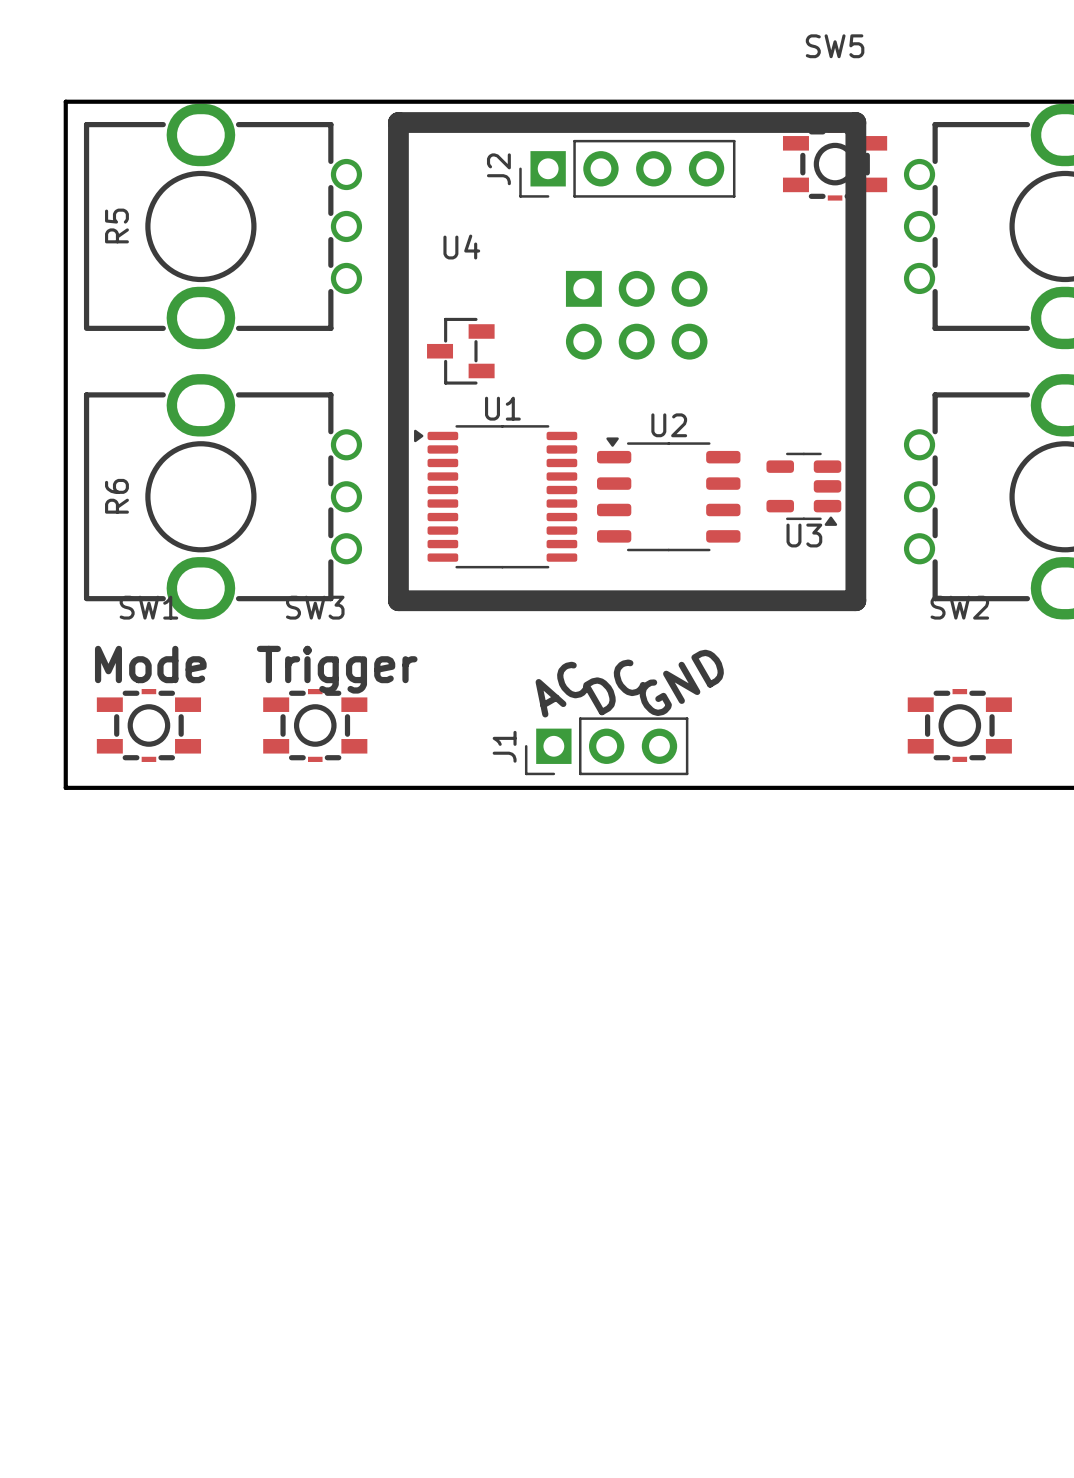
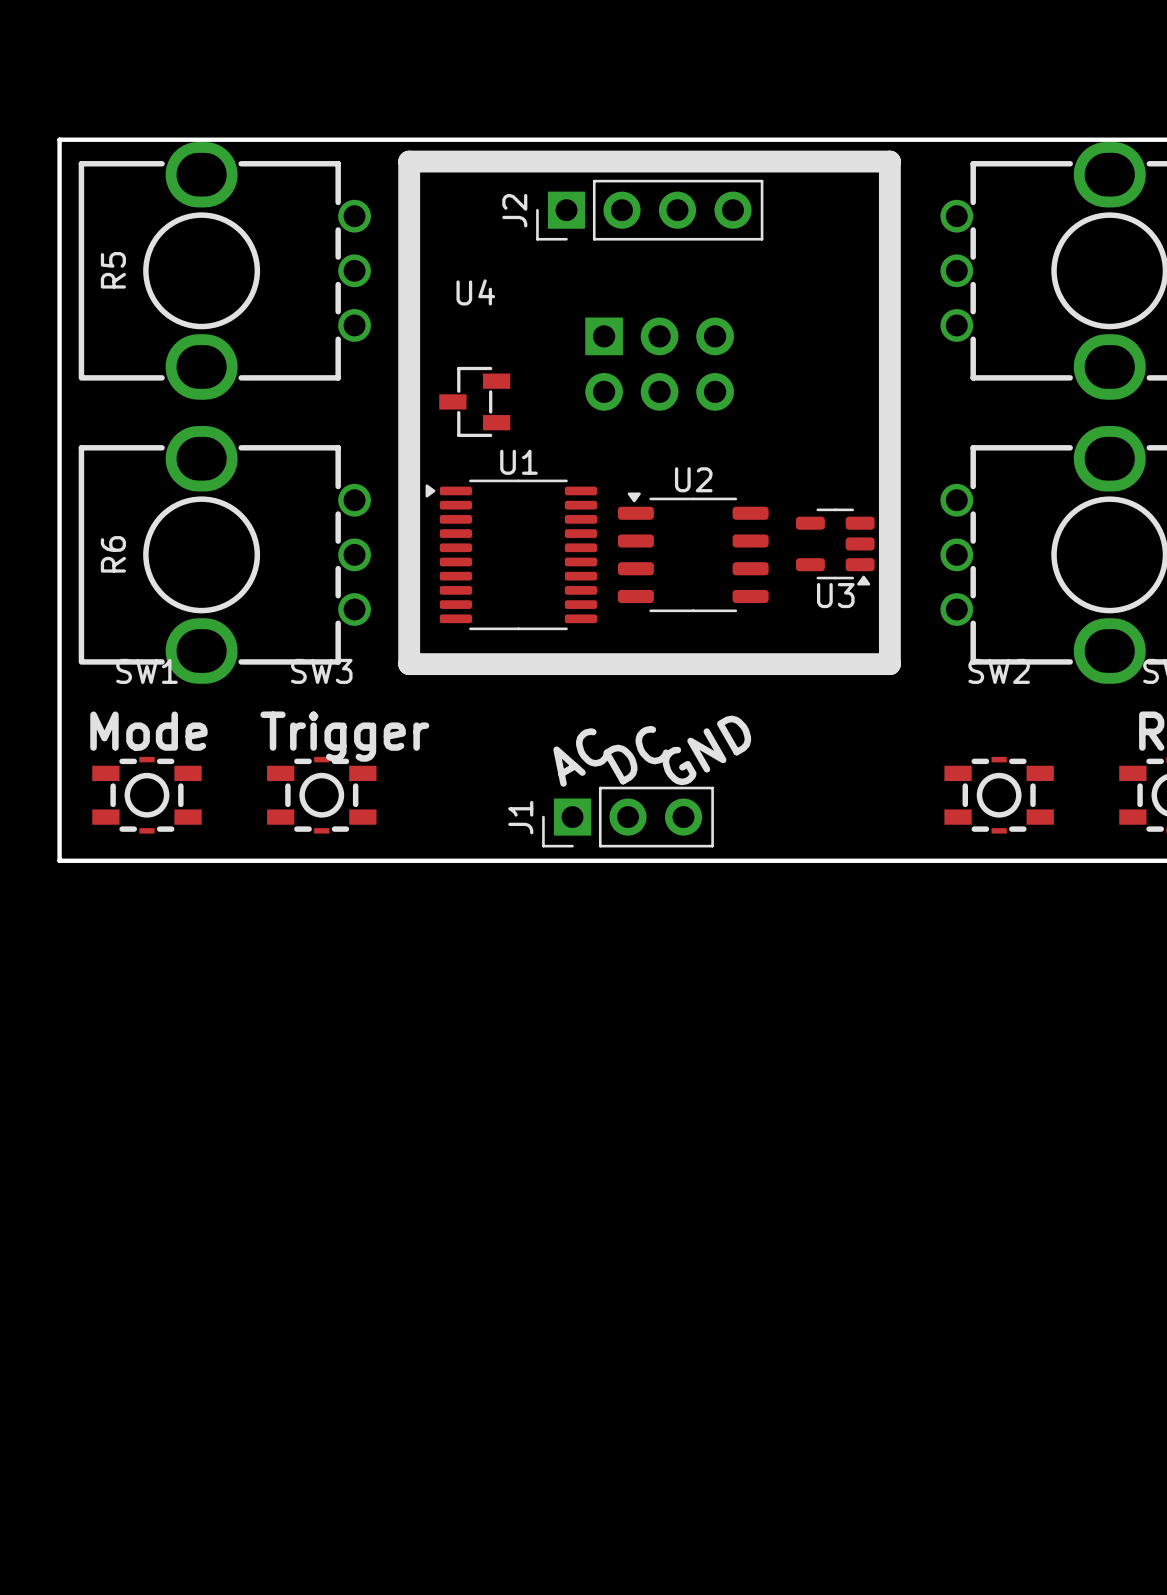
SW5: (835, 164) -> none

